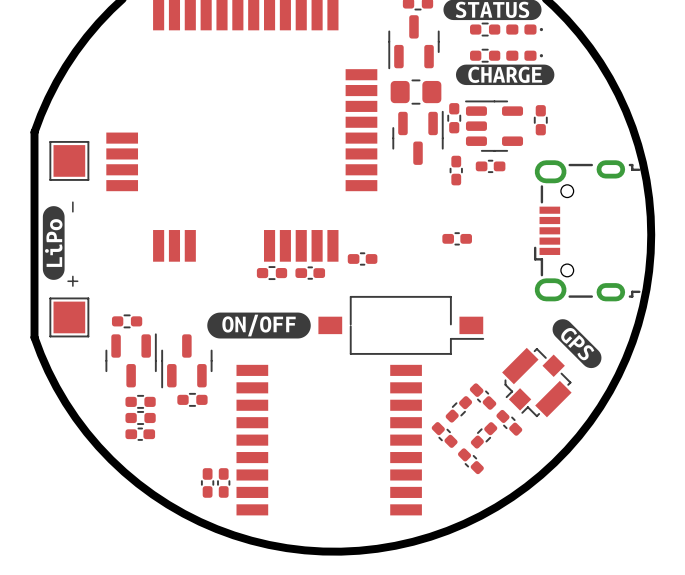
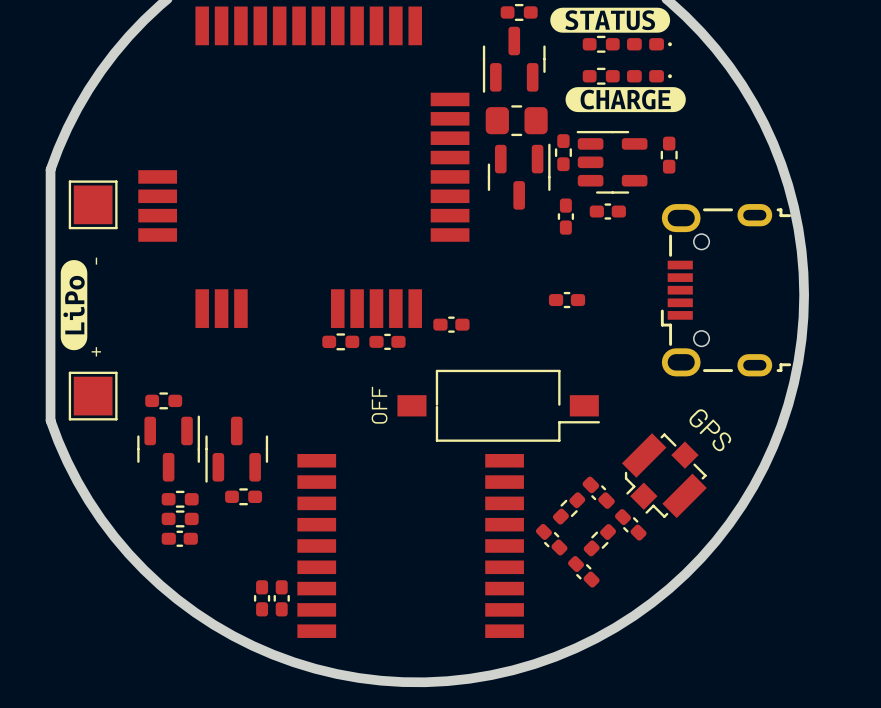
drawing: [207, 312, 311, 339] -> none
drawing: [552, 319, 602, 369] -> none
text: none -> OFF (379, 405)
part value: none -> GPS (710, 430)

